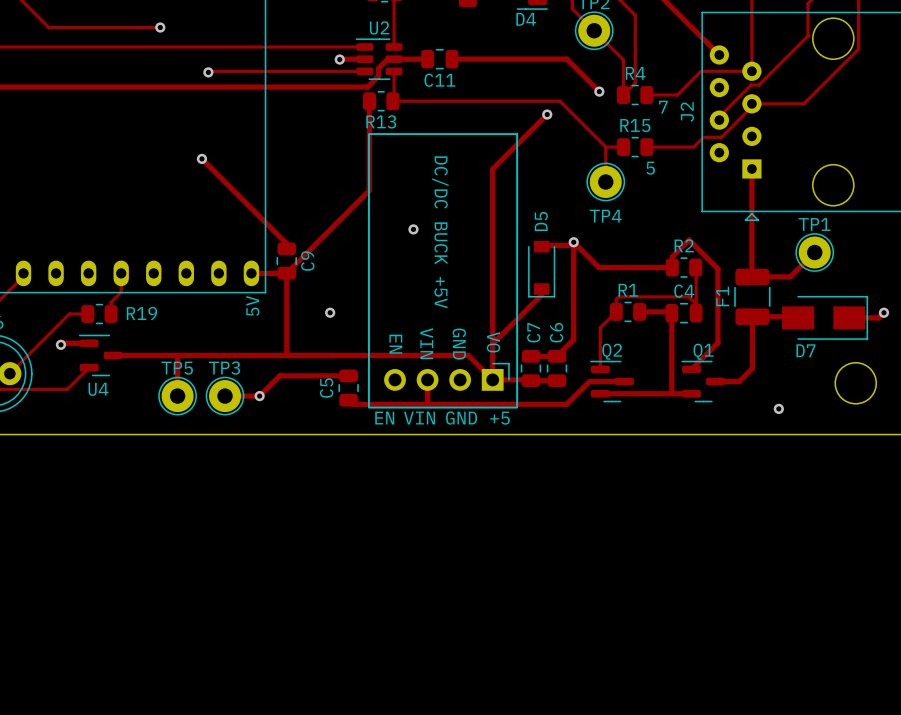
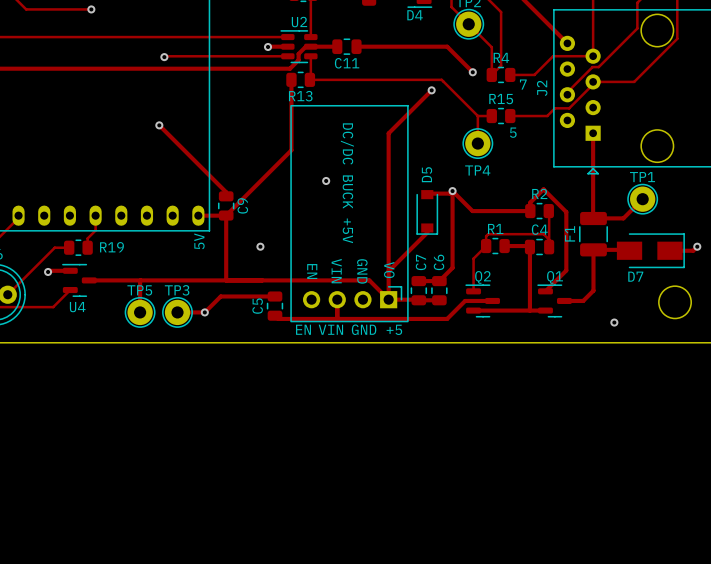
track: (33, 11) (48, 27) (160, 27) -> (26, 9) (91, 9)
via position: (160, 27) -> (91, 9)

